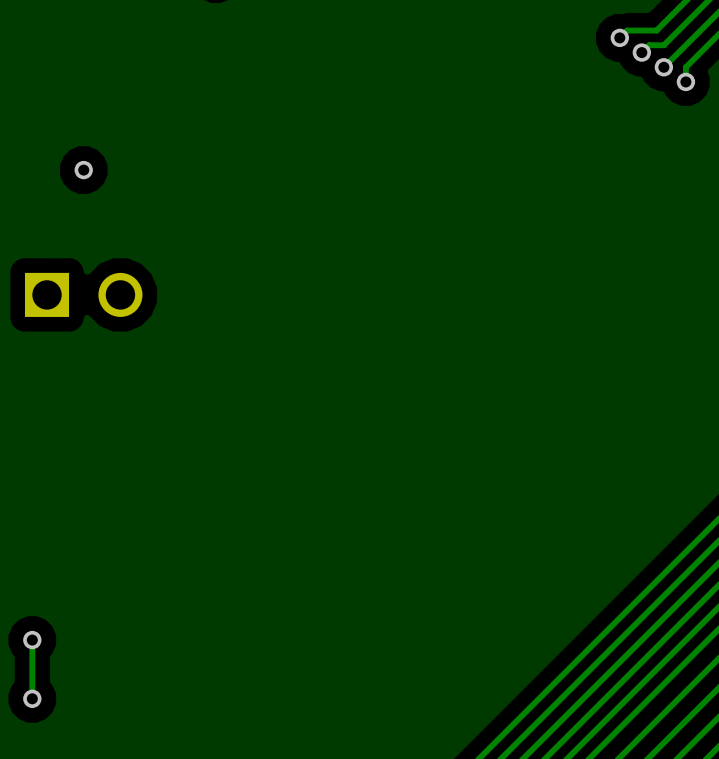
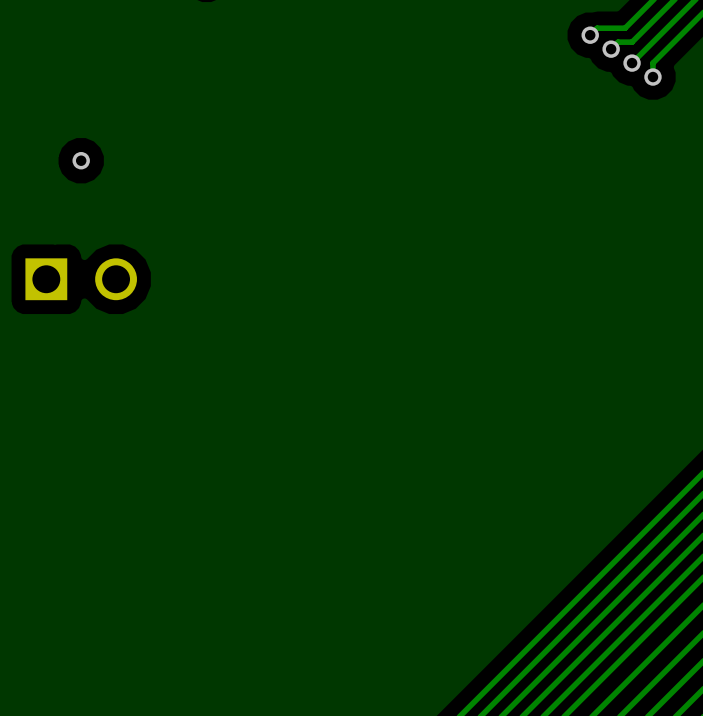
track: (32, 640) (32, 698) -> none
via: (32, 640) -> none
via: (32, 698) -> none

